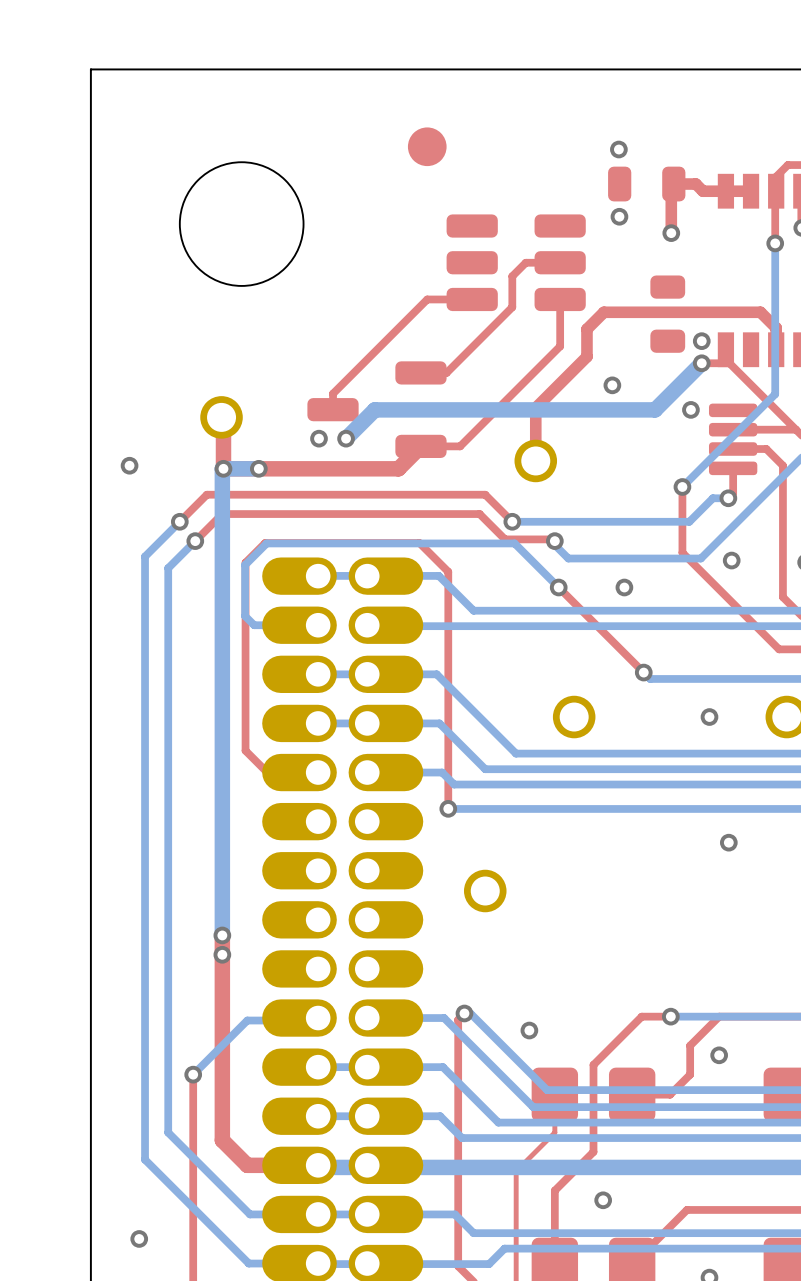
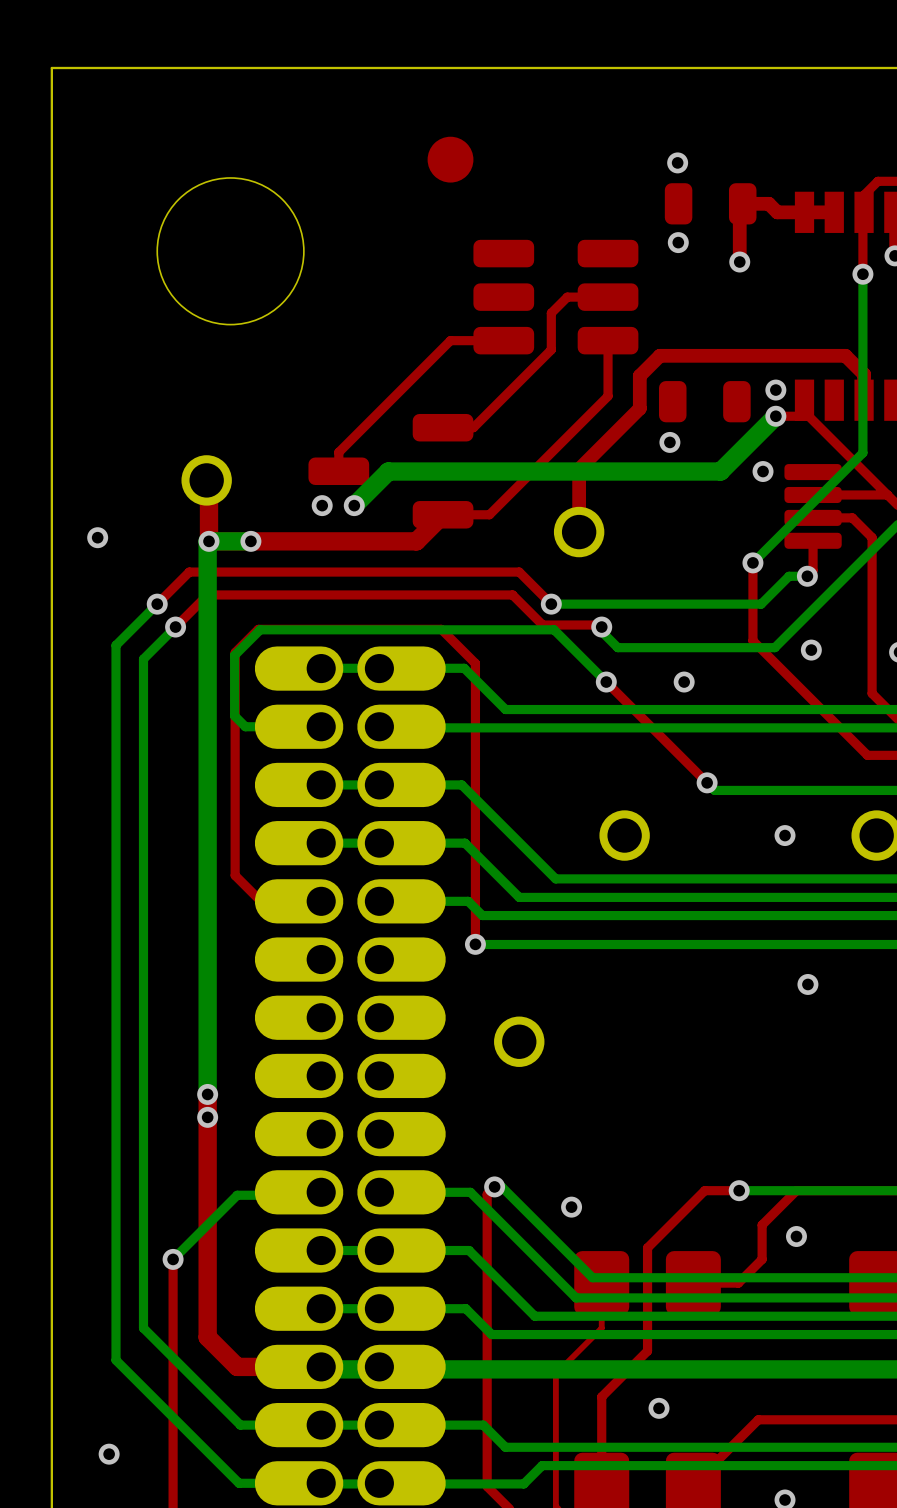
part rotation: 0° (667, 314) -> 90° clockwise (704, 401)

